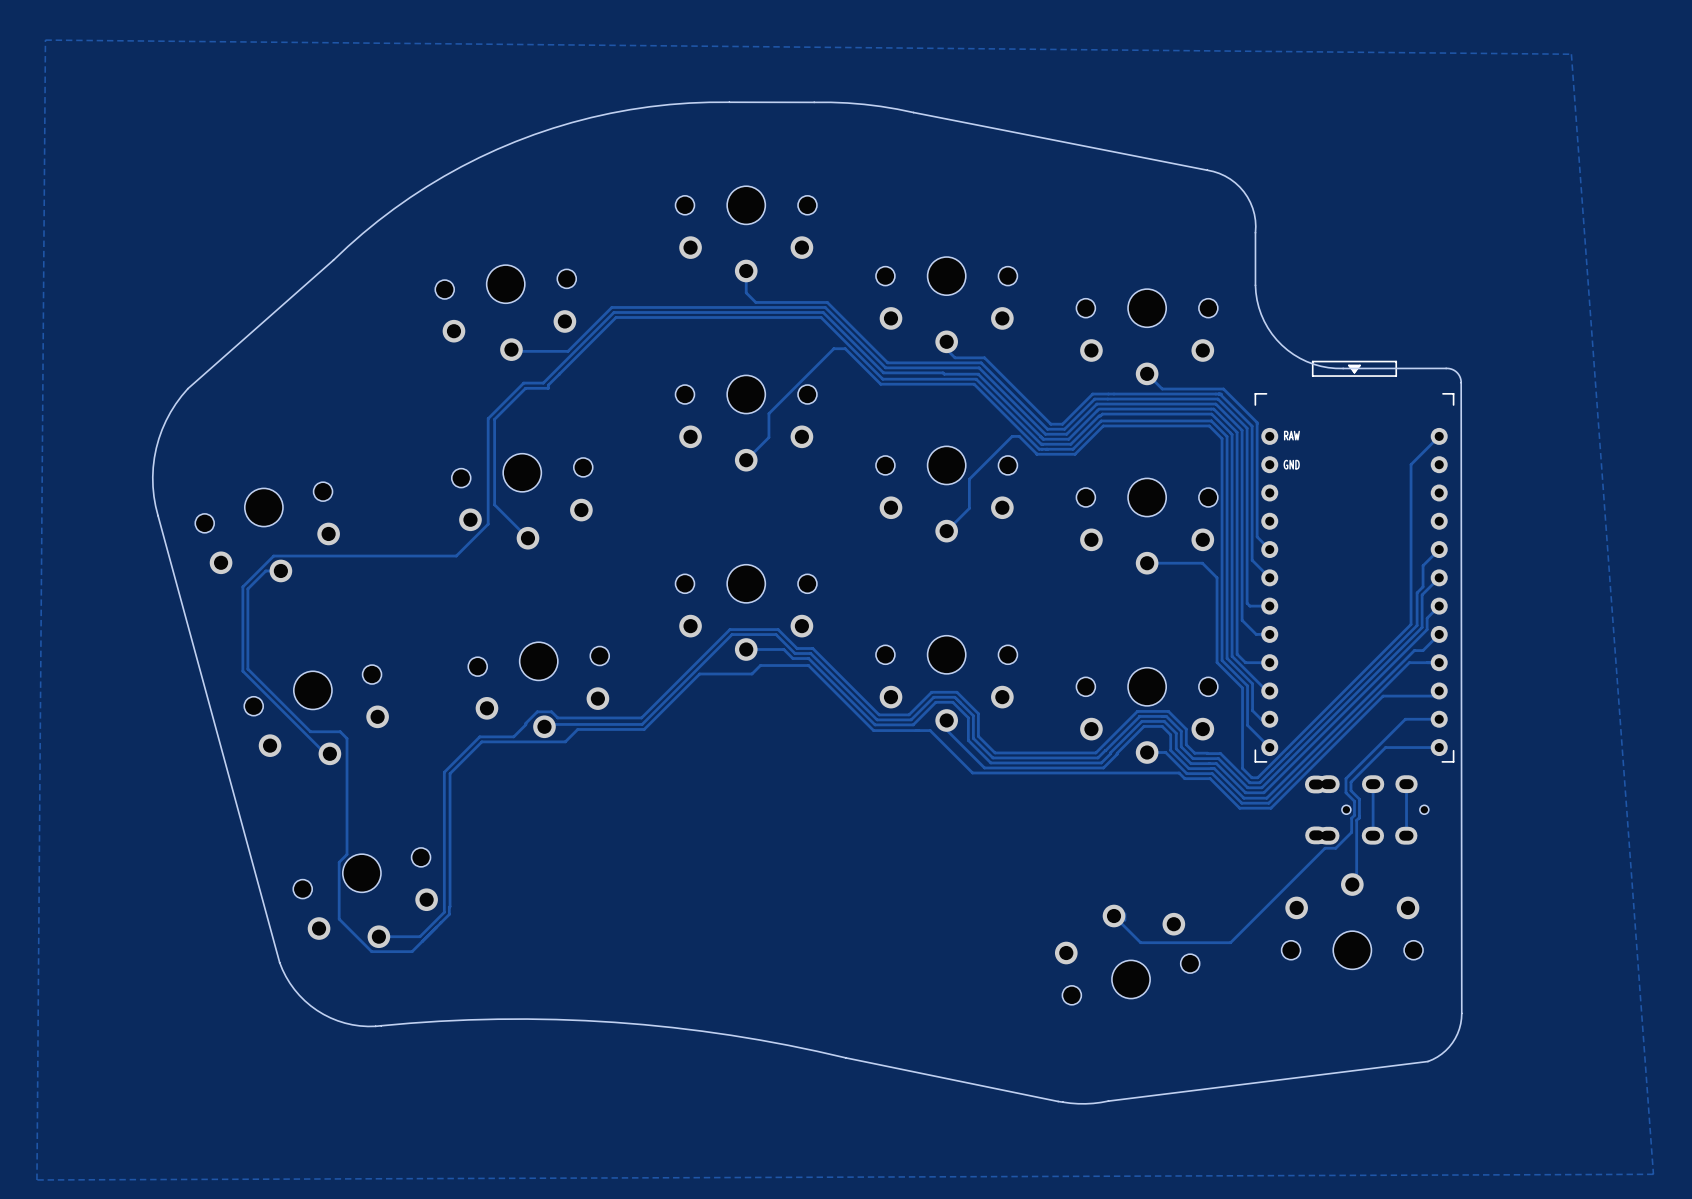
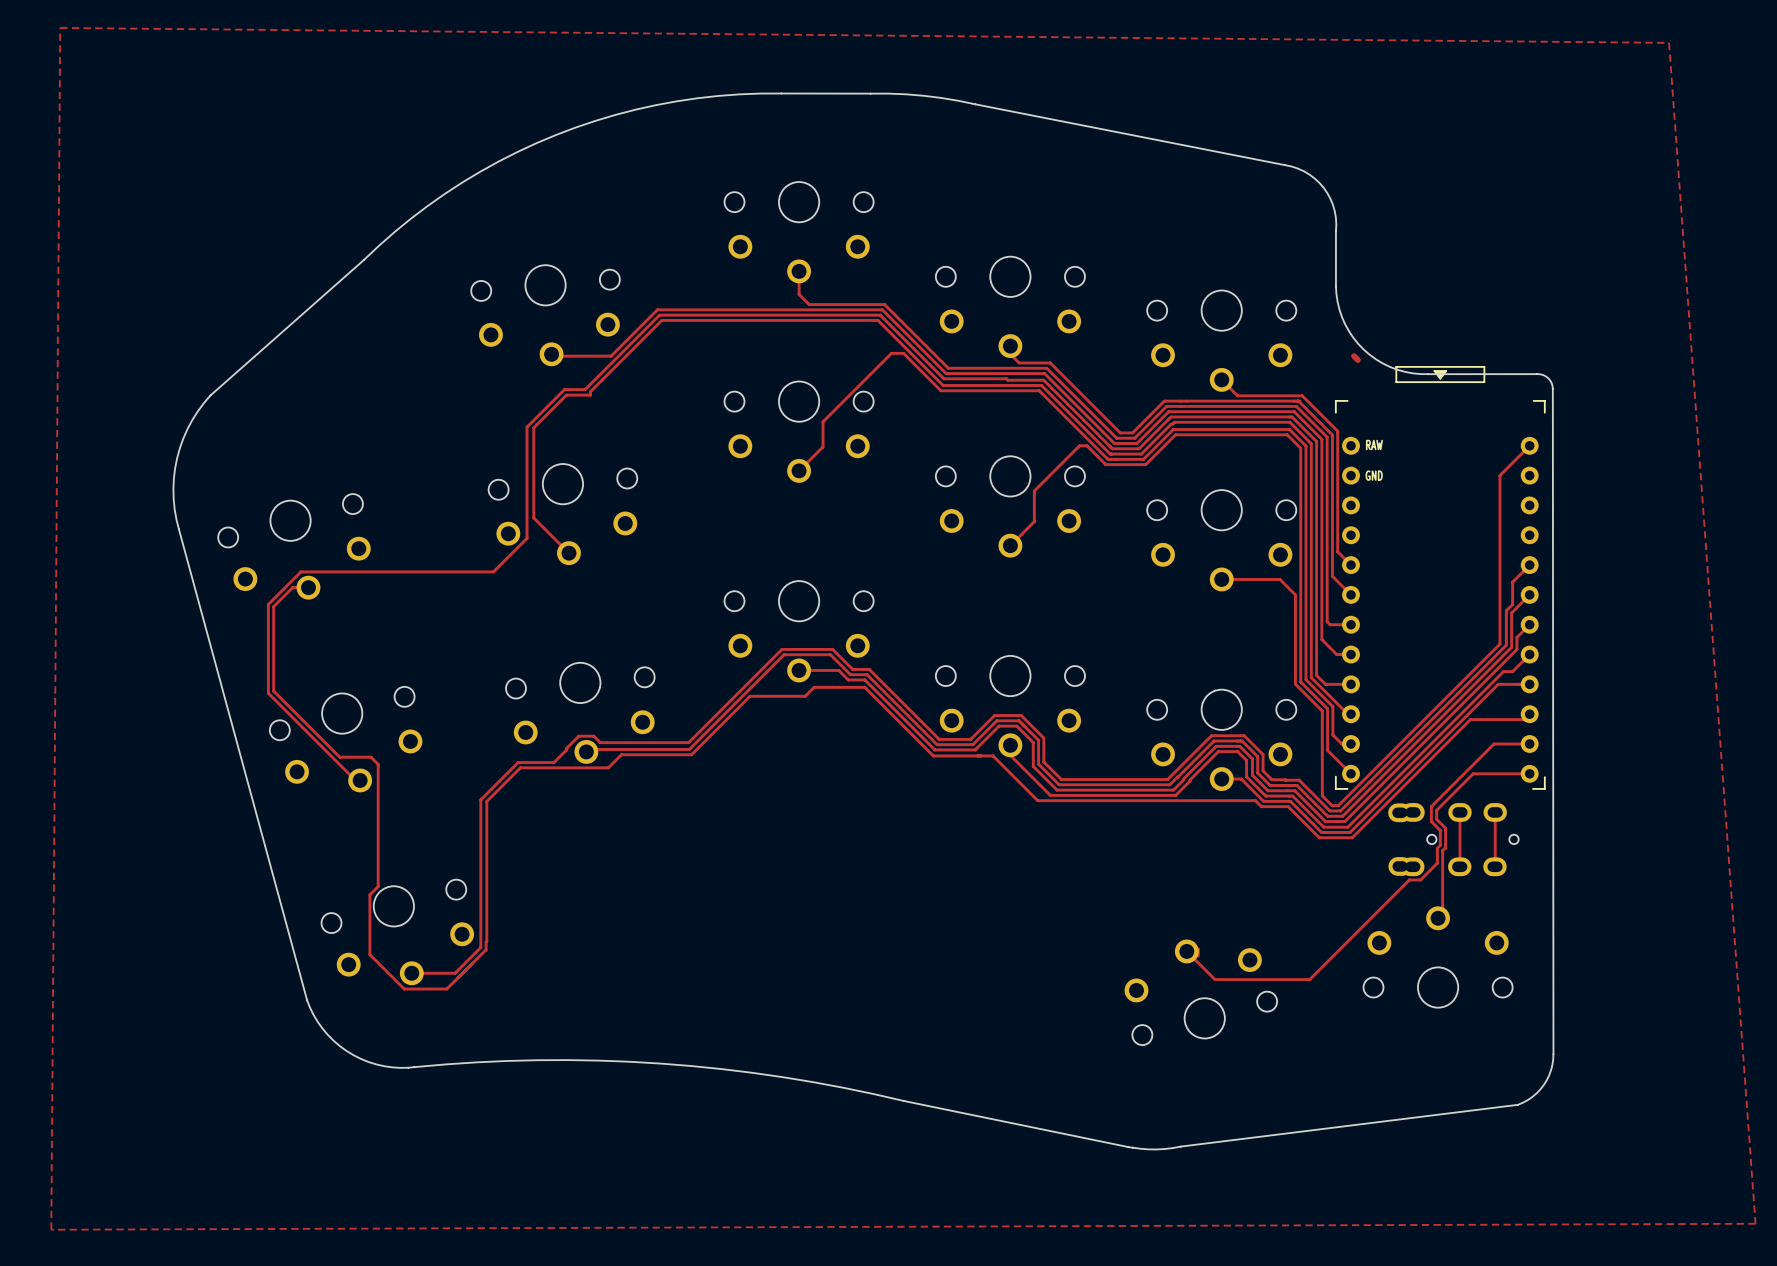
track: none -> (1354, 356) (1357, 360)

